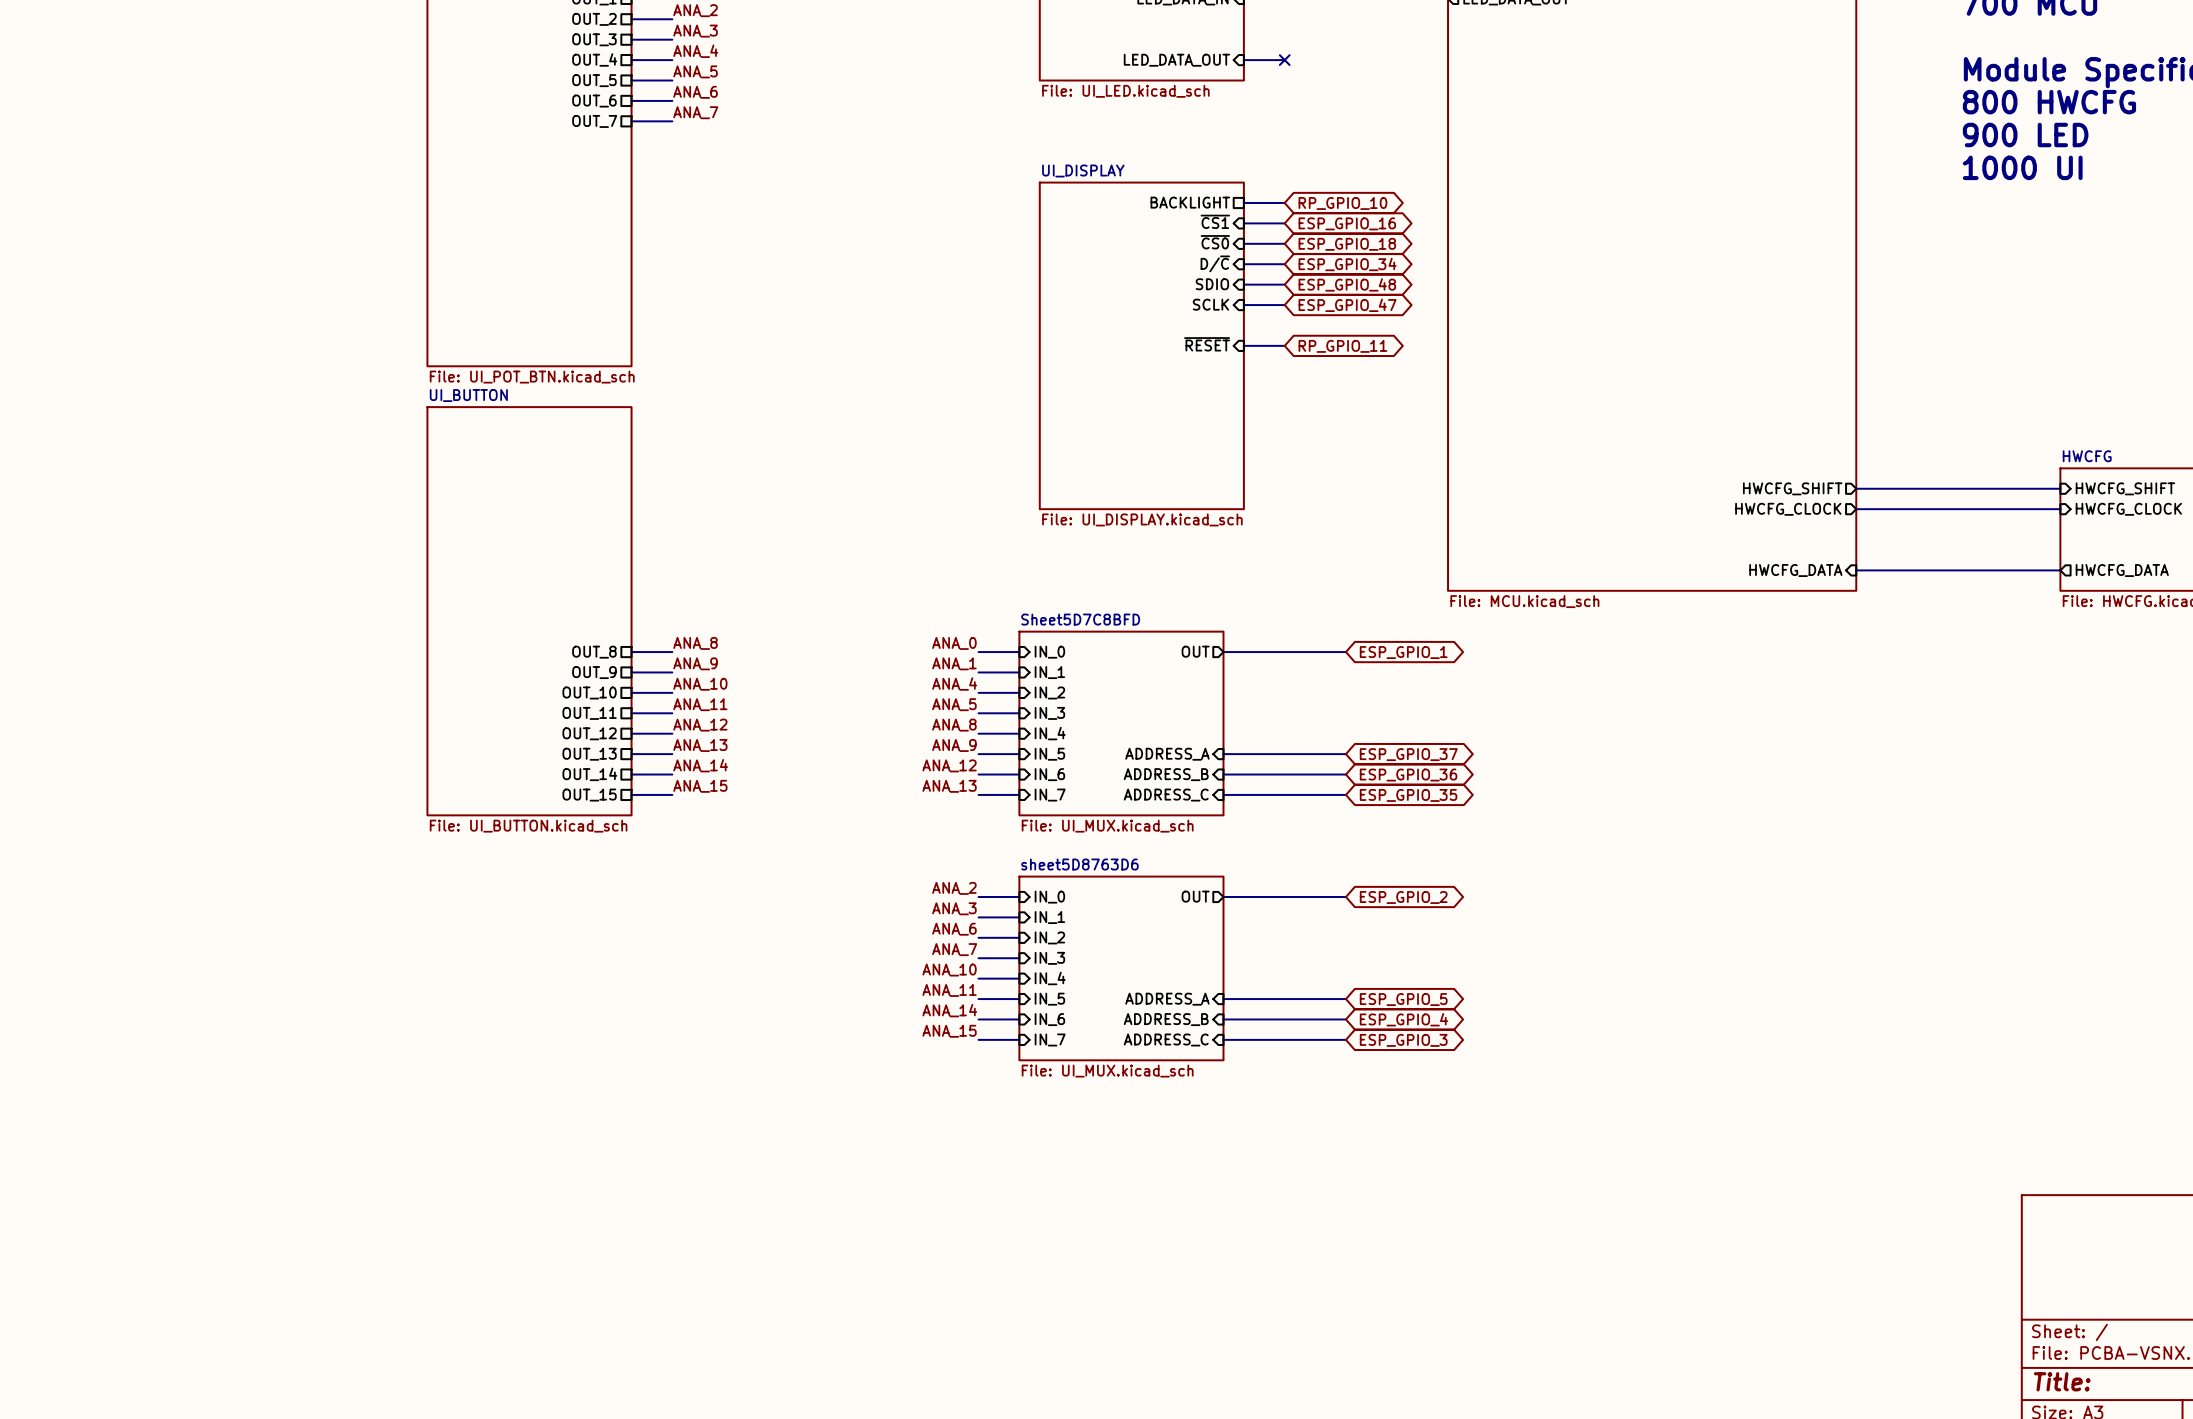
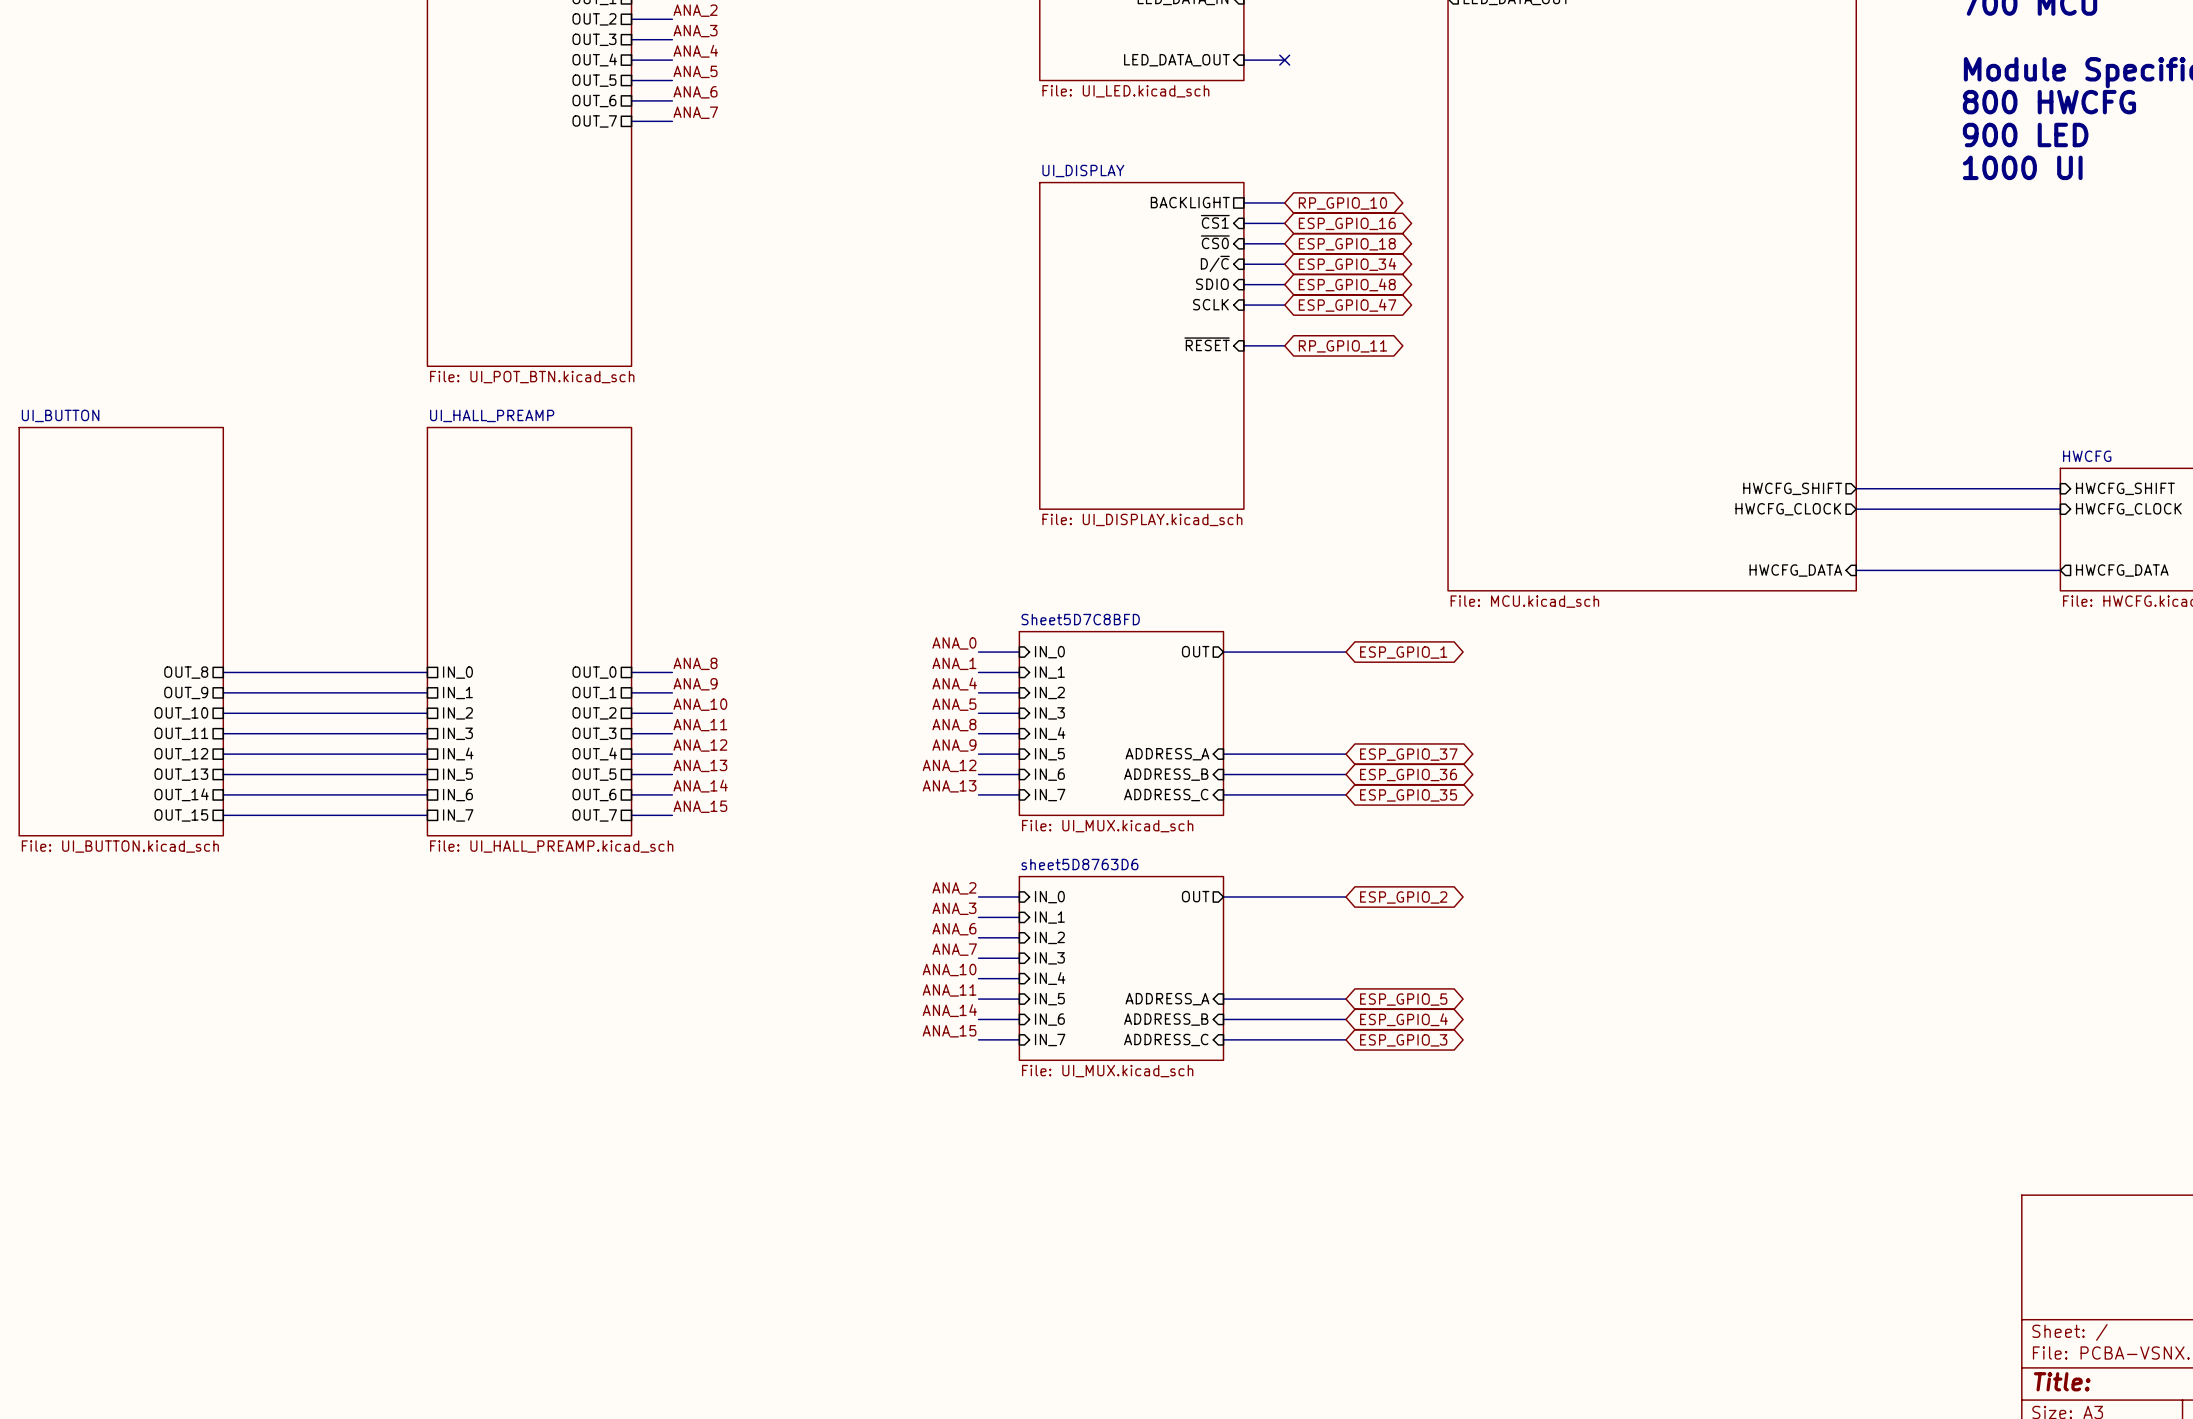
sheet UI_BUTTON: File: UI_BUTTON.kicad_sch (529, 611) -> none
sheet UI_BUTTON: none -> File: UI_BUTTON.kicad_sch (121, 631)
sheet UI_HALL_PREAMP: none -> File: UI_HALL_PREAMP.kicad_sch (529, 631)
label: ANA_8 (695, 643) -> none
sheet pin: OUT_8 (594, 652) -> none
wire: (631, 652) (672, 652) -> (631, 815) (672, 815)
label: ANA_9 (695, 663) -> ANA_8 (695, 663)
sheet pin: none -> OUT_8 (186, 672)
wire: none -> (223, 672) (427, 672)
sheet pin: none -> IN_0 (457, 672)
sheet pin: OUT_9 (594, 672) -> OUT_0 (594, 672)
label: ANA_10 (700, 684) -> ANA_9 (695, 684)
sheet pin: none -> OUT_9 (186, 692)
wire: none -> (223, 692) (427, 692)
sheet pin: none -> IN_1 (457, 692)
sheet pin: OUT_10 (589, 692) -> OUT_1 (594, 692)
label: ANA_11 (700, 704) -> ANA_10 (700, 704)
sheet pin: none -> OUT_10 (181, 713)
wire: none -> (223, 713) (427, 713)
sheet pin: none -> IN_2 (457, 713)
sheet pin: OUT_11 (589, 713) -> OUT_2 (594, 713)
label: ANA_12 (700, 725) -> ANA_11 (700, 725)
sheet pin: none -> OUT_11 (181, 733)
wire: none -> (223, 733) (427, 733)
sheet pin: none -> IN_3 (457, 733)
sheet pin: OUT_12 (589, 733) -> OUT_3 (594, 733)
label: ANA_13 (700, 745) -> ANA_12 (700, 745)
sheet pin: none -> IN_4 (458, 753)
sheet pin: none -> OUT_12 (181, 754)
wire: none -> (223, 754) (427, 754)
sheet pin: OUT_13 (589, 754) -> OUT_4 (594, 753)
label: ANA_14 (700, 765) -> ANA_13 (700, 765)
sheet pin: none -> OUT_13 (181, 774)
wire: none -> (223, 774) (427, 774)
sheet pin: none -> IN_5 (457, 774)
sheet pin: OUT_14 (589, 774) -> OUT_5 (594, 774)
label: ANA_15 (700, 786) -> ANA_14 (700, 786)
sheet pin: none -> OUT_14 (181, 794)
wire: none -> (223, 794) (427, 794)
sheet pin: none -> IN_6 (457, 795)
sheet pin: OUT_15 (589, 795) -> OUT_6 (594, 795)
label: none -> ANA_15 (700, 806)
sheet pin: none -> OUT_15 (181, 815)
wire: none -> (223, 815) (427, 815)
sheet pin: none -> IN_7 (458, 815)
sheet pin: none -> OUT_7 (594, 815)

